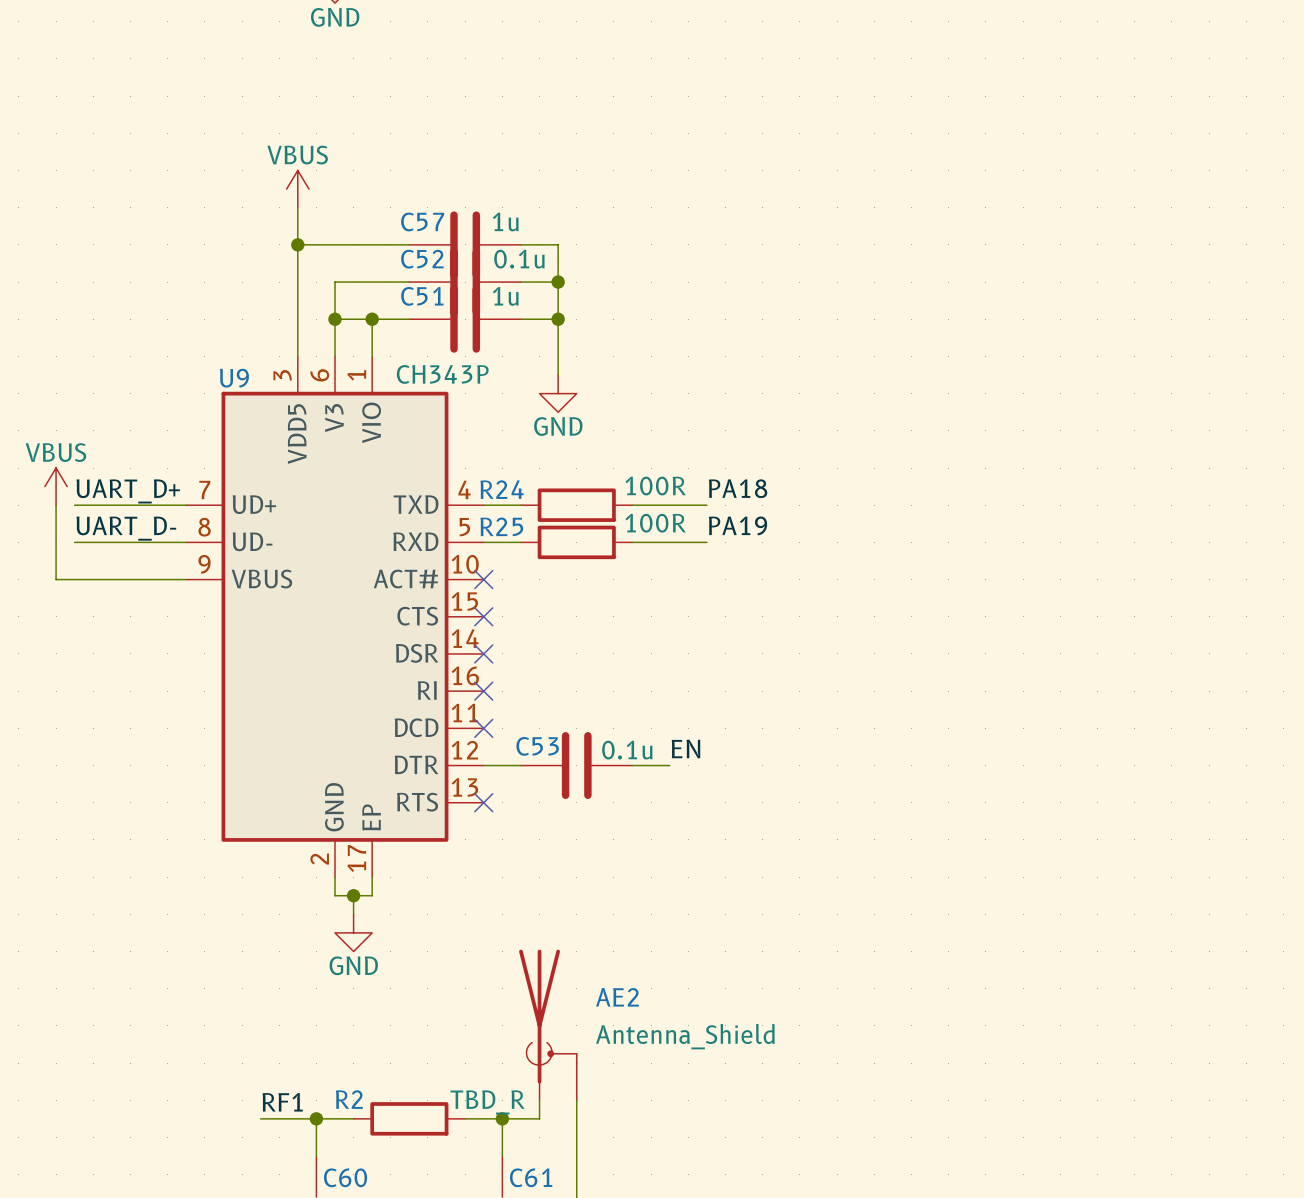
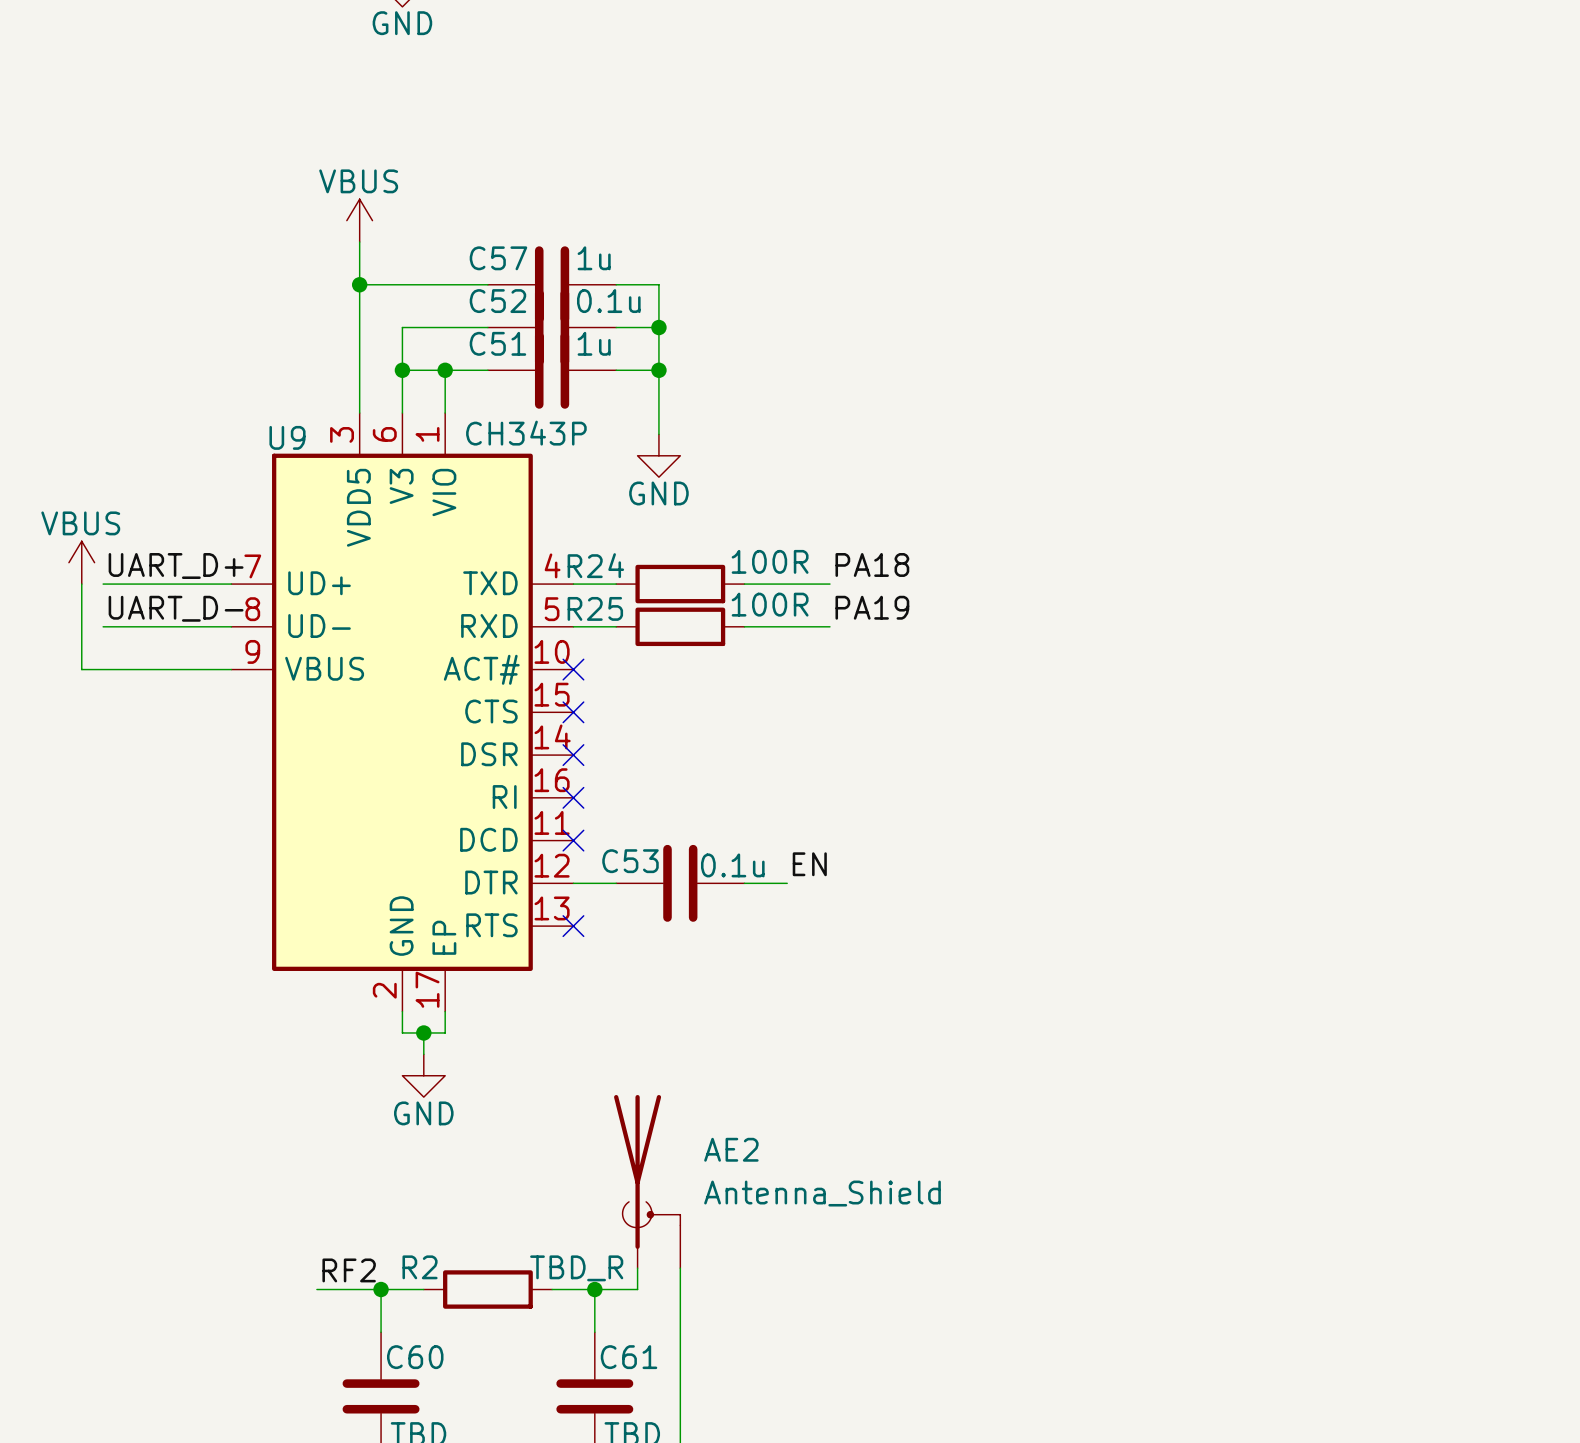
label: RF1 (282, 1102) -> RF2 (349, 1270)

